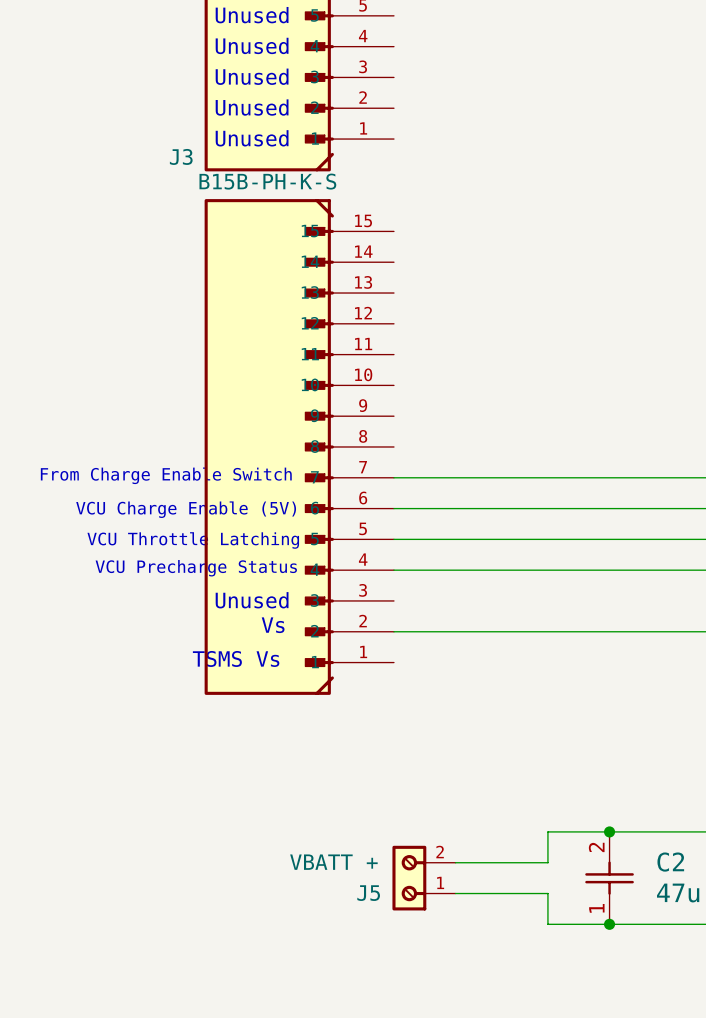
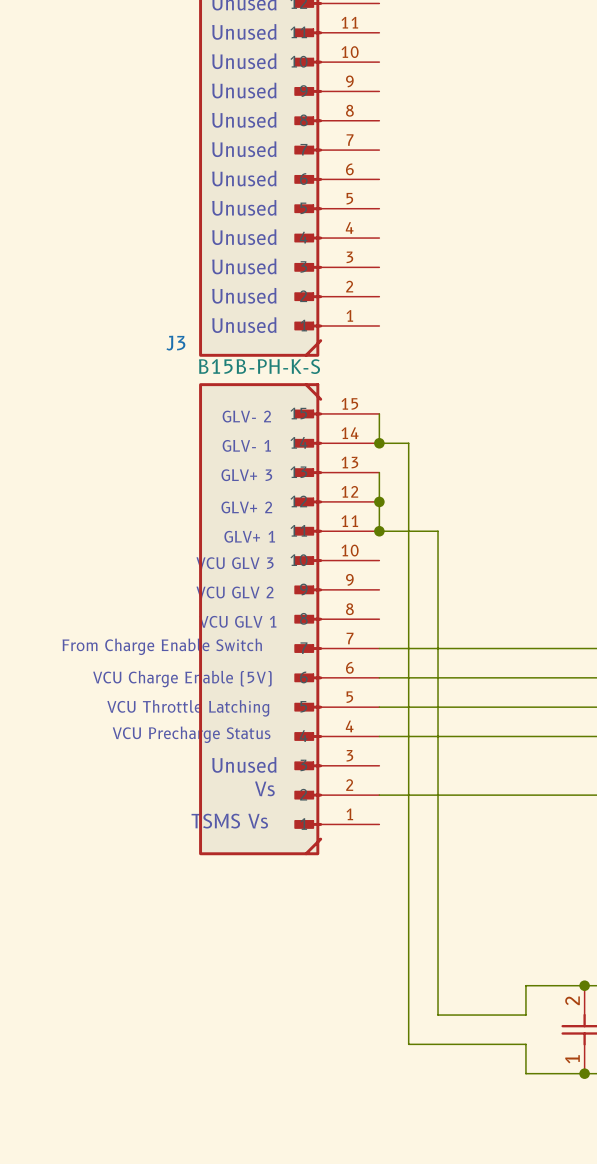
wire: none -> (379, 413) (379, 443) (408, 443) (408, 1044) (438, 1044)
text: none -> GLV- 2 (246, 416)
junction: none -> (379, 443)
text: none -> GLV- 1 (246, 445)
wire: none -> (379, 472) (379, 531) (438, 531) (438, 1015)
text: none -> GLV+ 3 (246, 475)
junction: none -> (379, 501)
text: none -> GLV+ 2 (246, 507)
junction: none -> (379, 531)
text: none -> GLV+ 1 (249, 536)
text: none -> VCU GLV 3 (235, 563)
text: none -> VCU GLV 2 (235, 592)
text: none -> VCU GLV 1 (237, 621)
J5: VBATT + (424, 878) -> none

